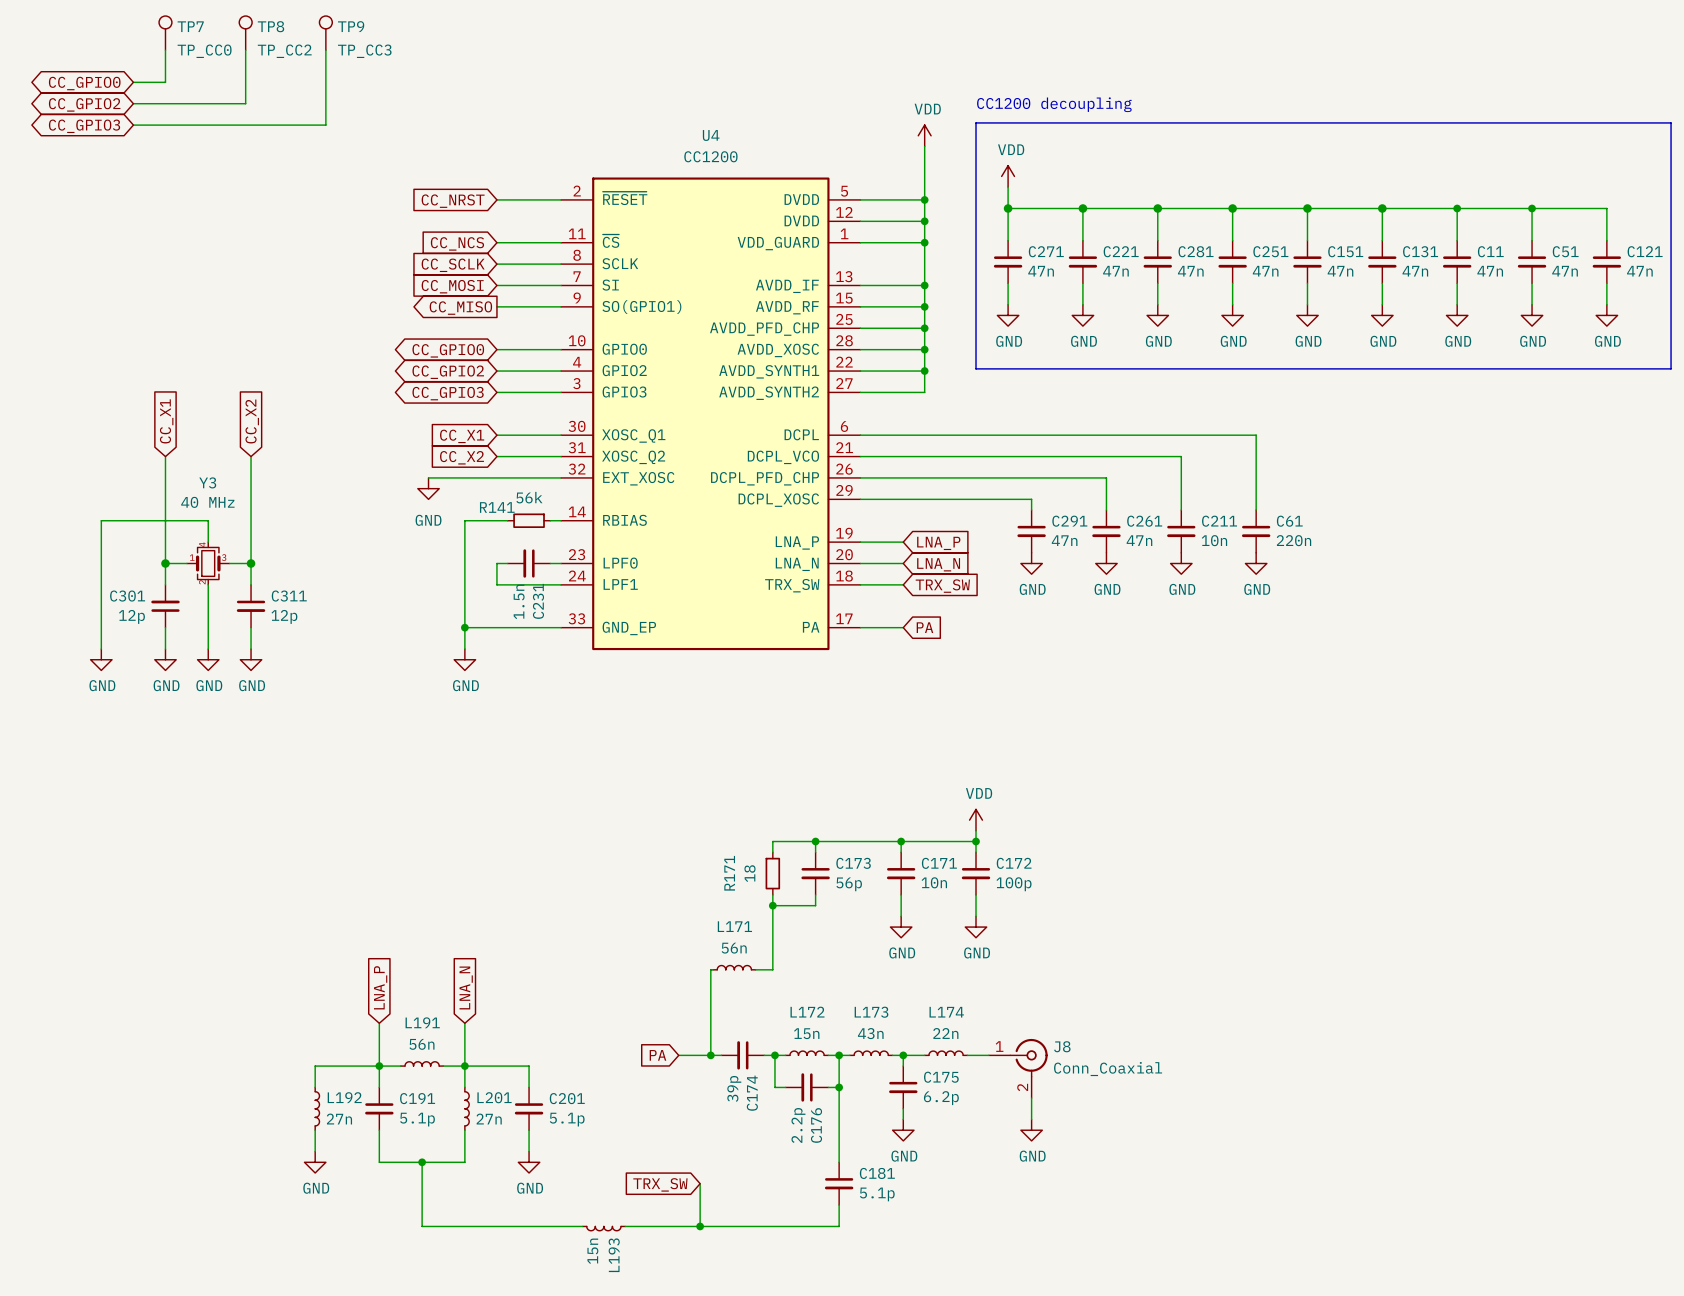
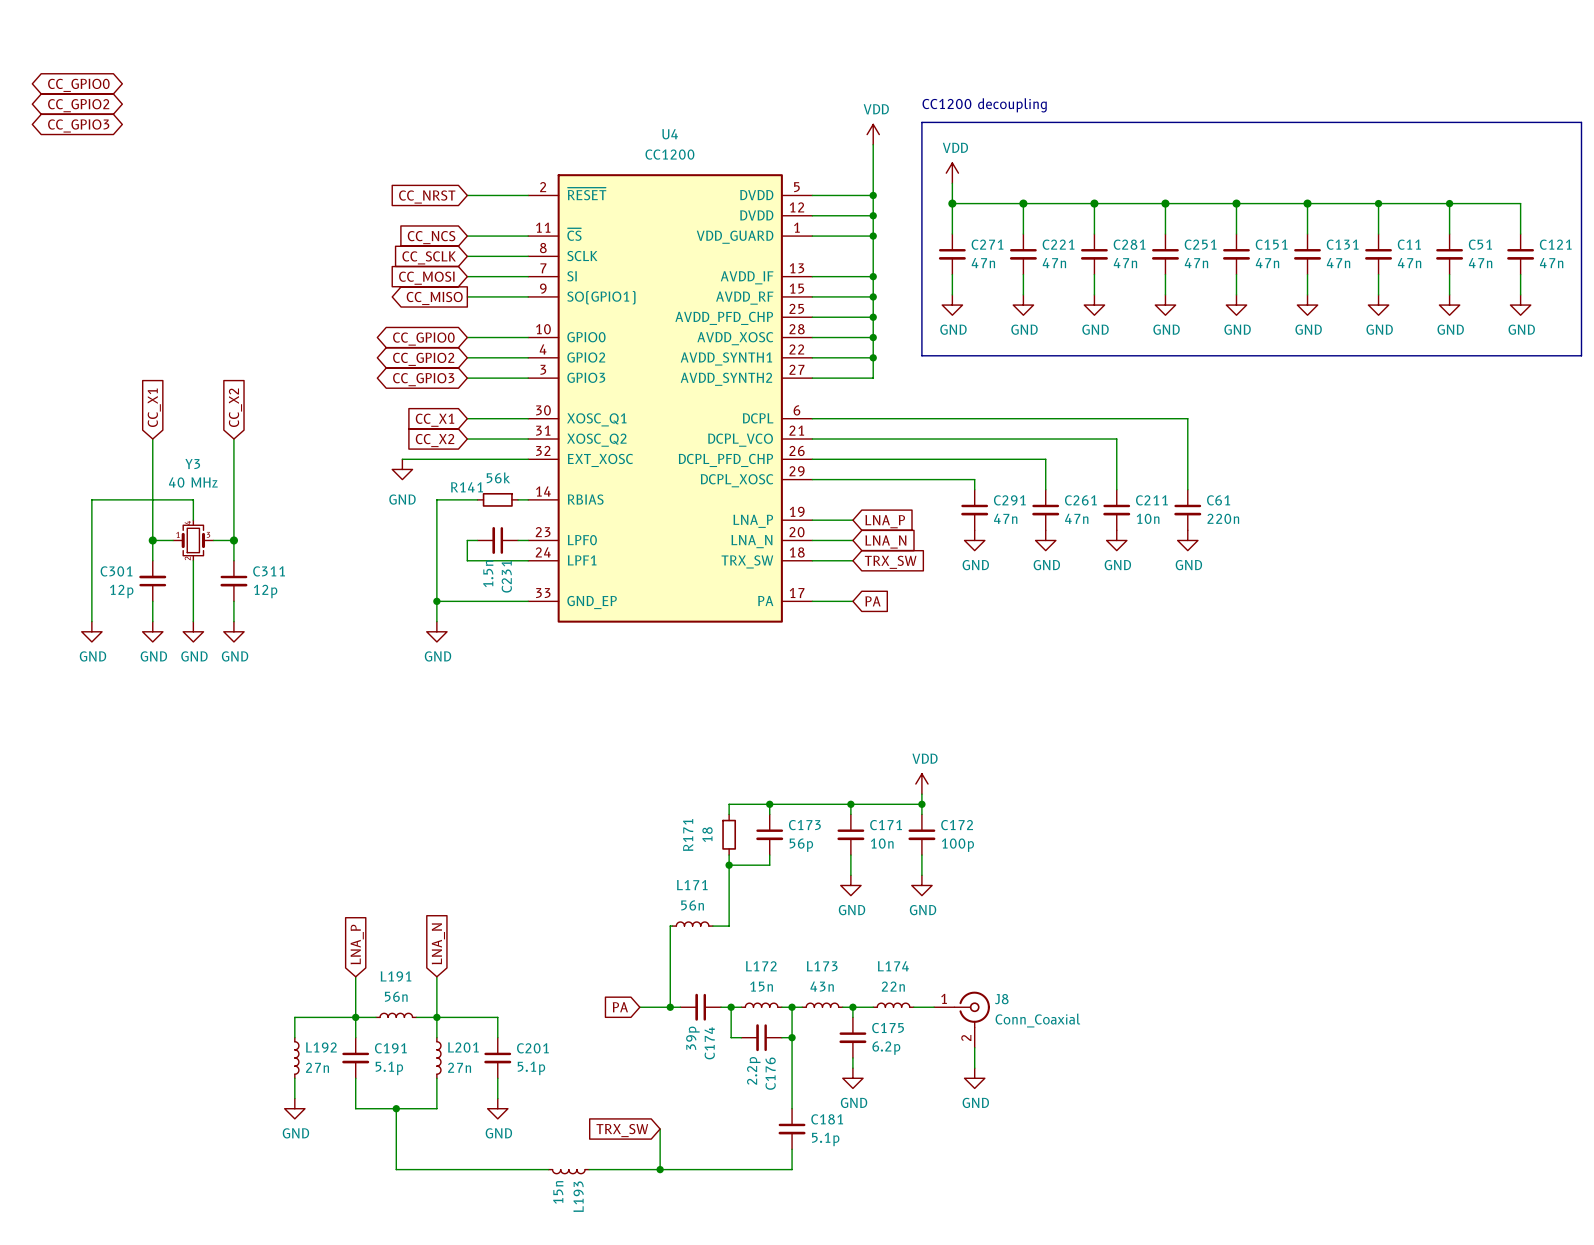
TP7: TP_CC0 (165, 33) -> none
TP8: TP_CC2 (245, 33) -> none
TP9: TP_CC3 (325, 33) -> none
wire: (165, 50) (165, 82) (133, 82) -> none
wire: (245, 50) (245, 103) (133, 103) -> none
wire: (325, 50) (325, 125) (133, 125) -> none

